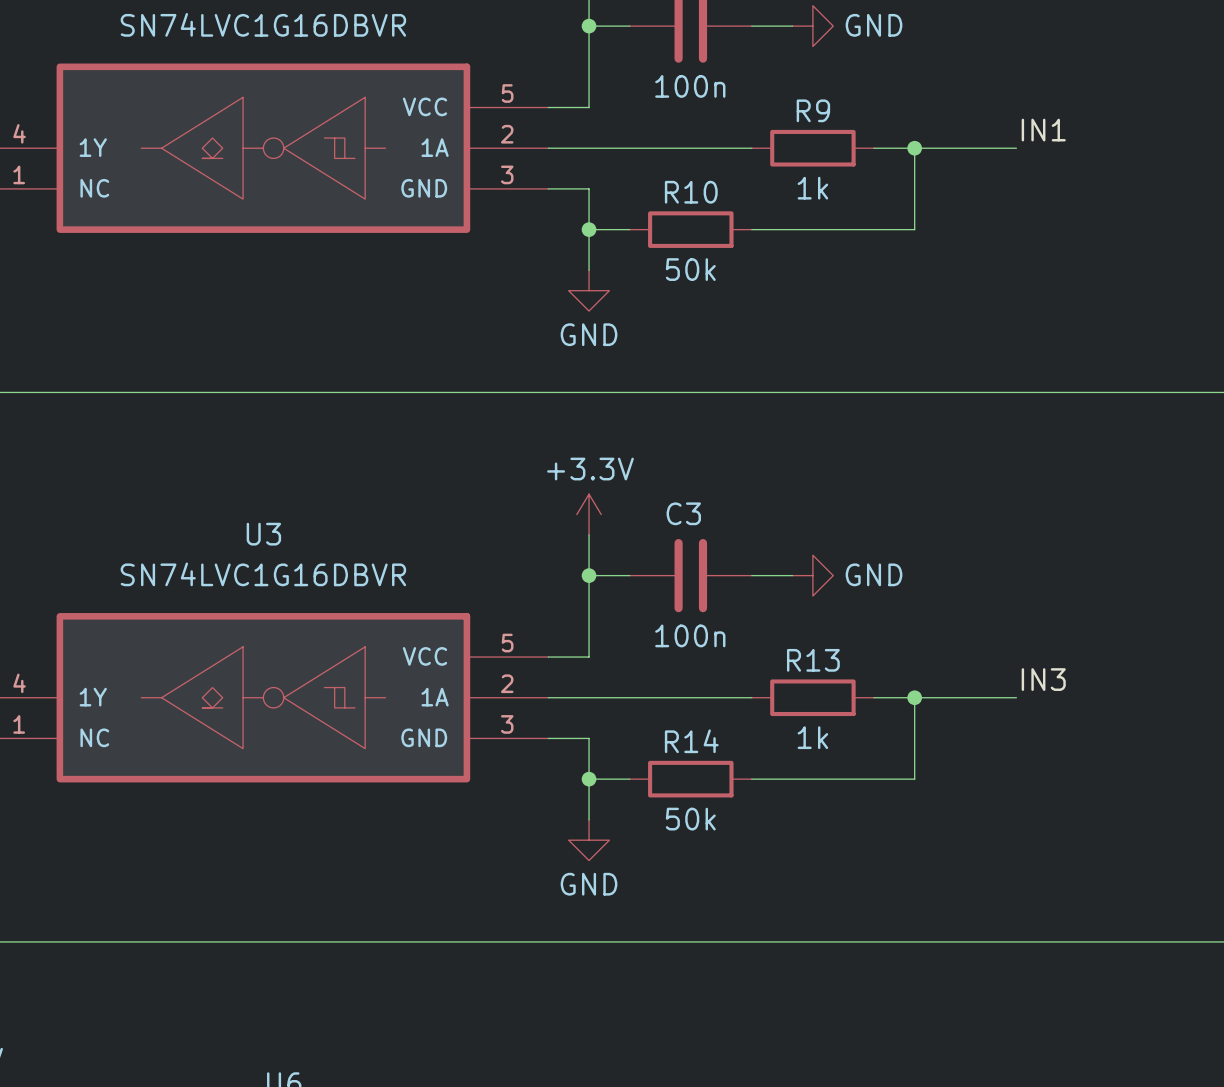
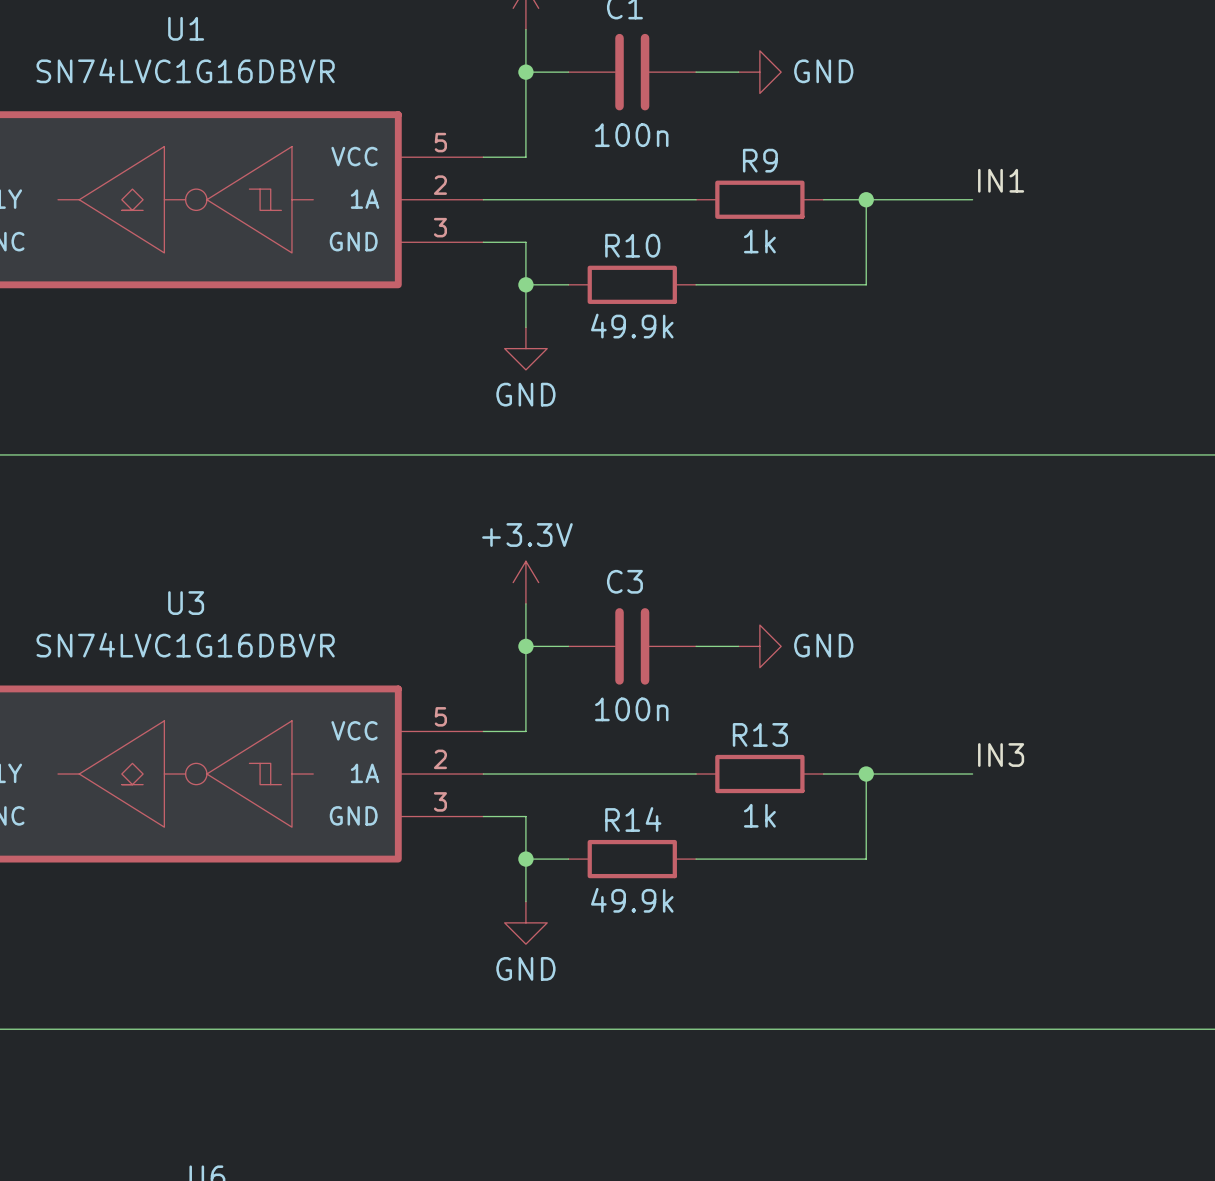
R10 value: 50k (690, 269) -> 49.9k (632, 326)
R14 value: 50k (690, 819) -> 49.9k (632, 900)

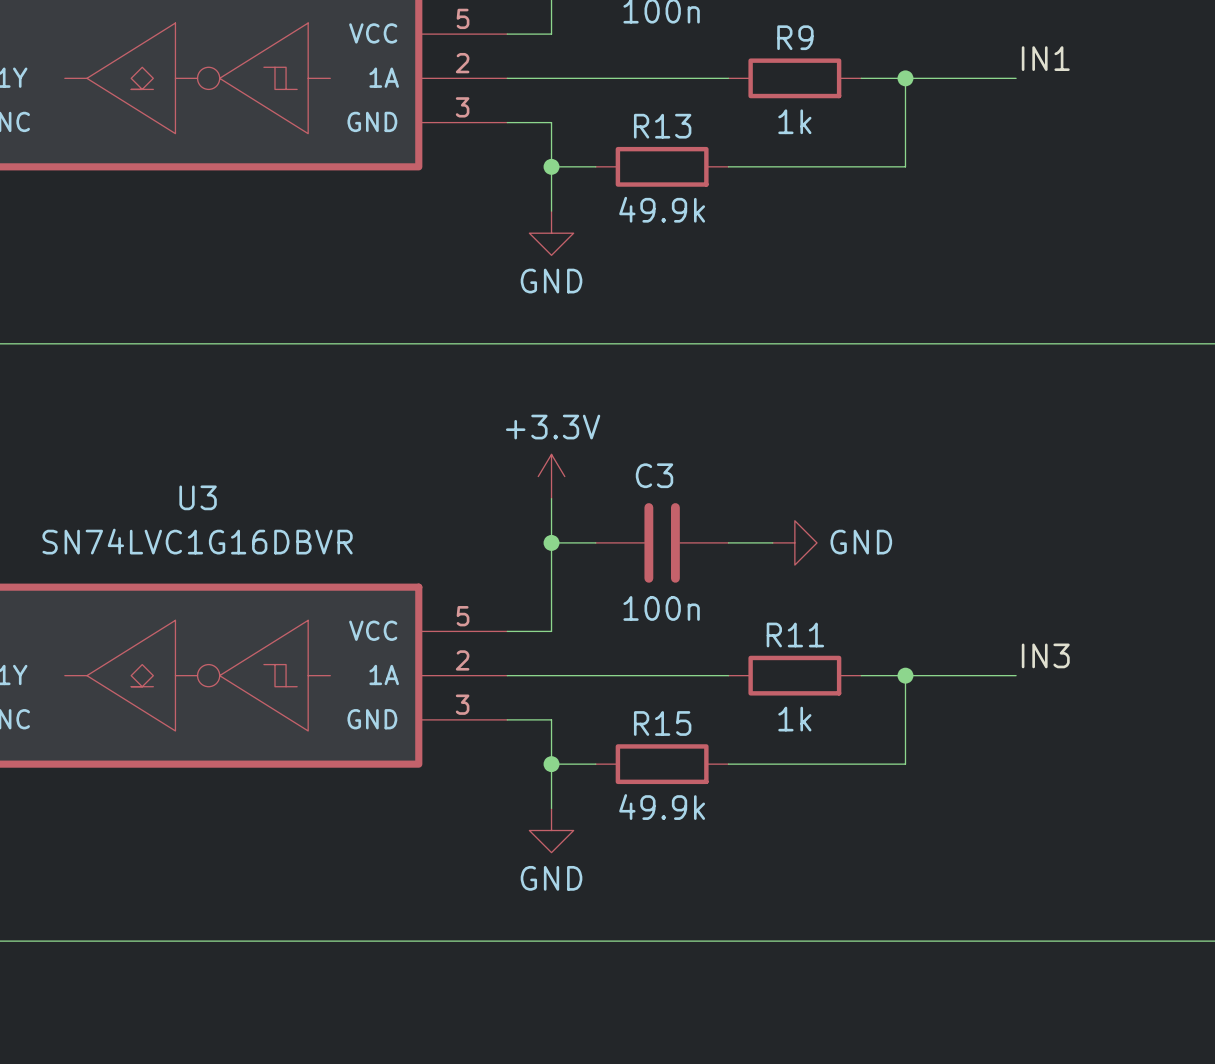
R10 name: R10 (632, 245) -> R13 (662, 126)
R13 name: R13 (760, 734) -> R11 (795, 635)
R14 name: R14 (633, 819) -> R15 (662, 723)

